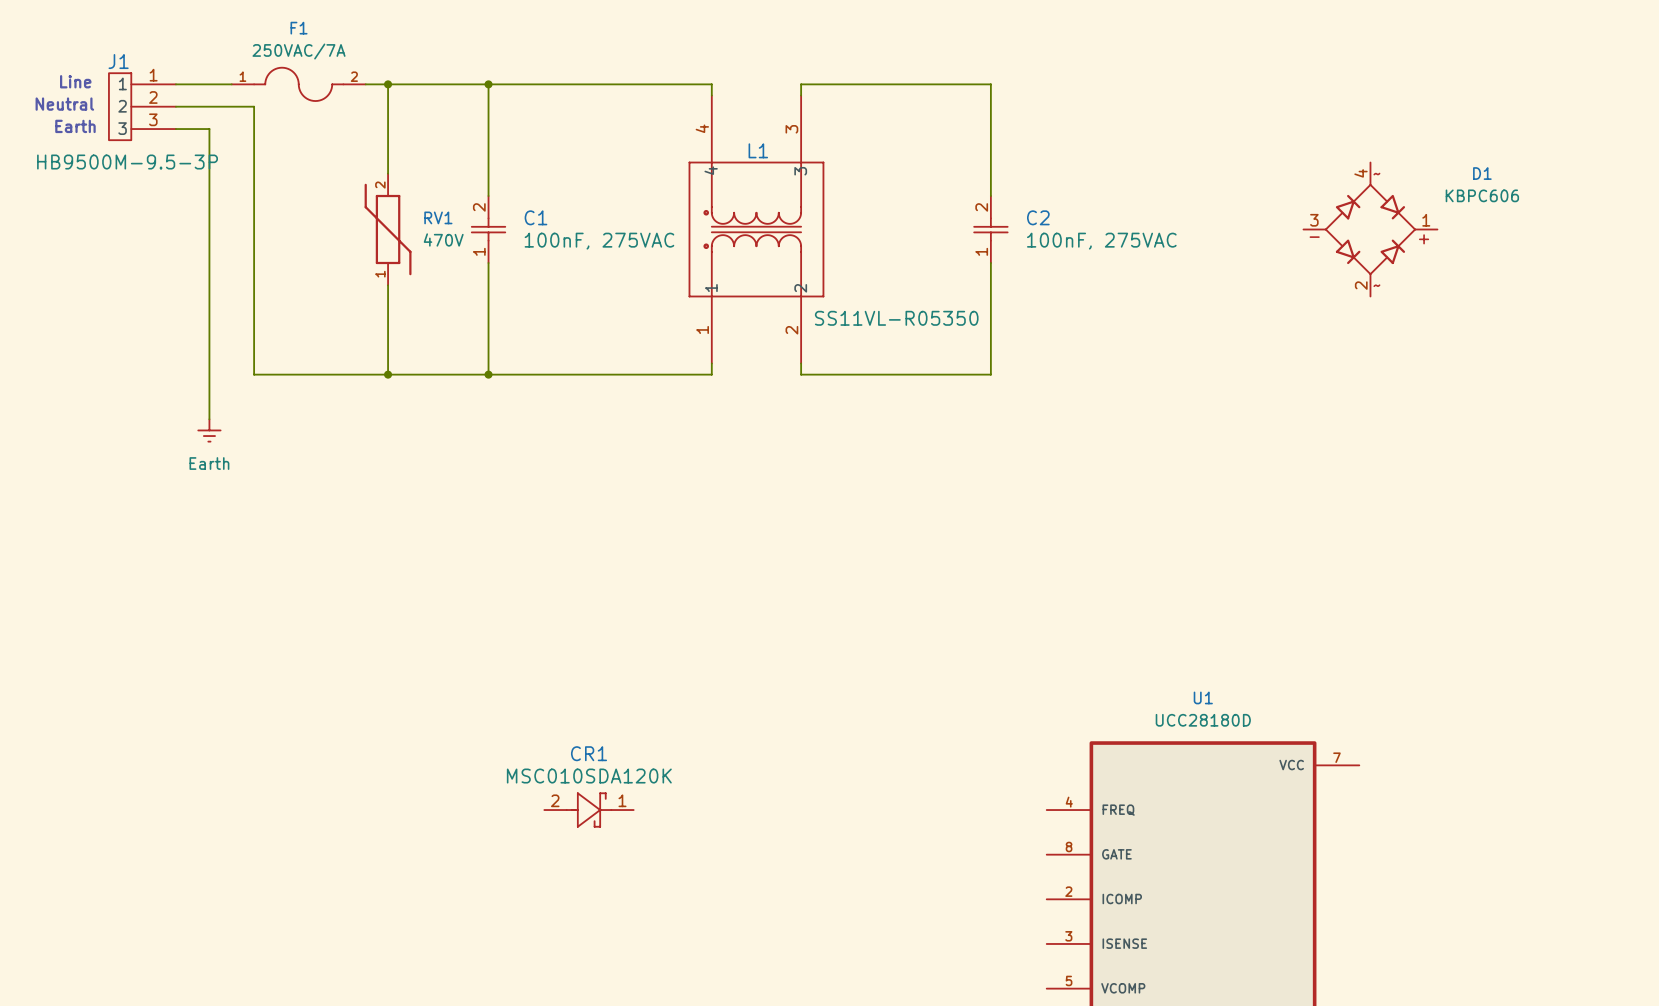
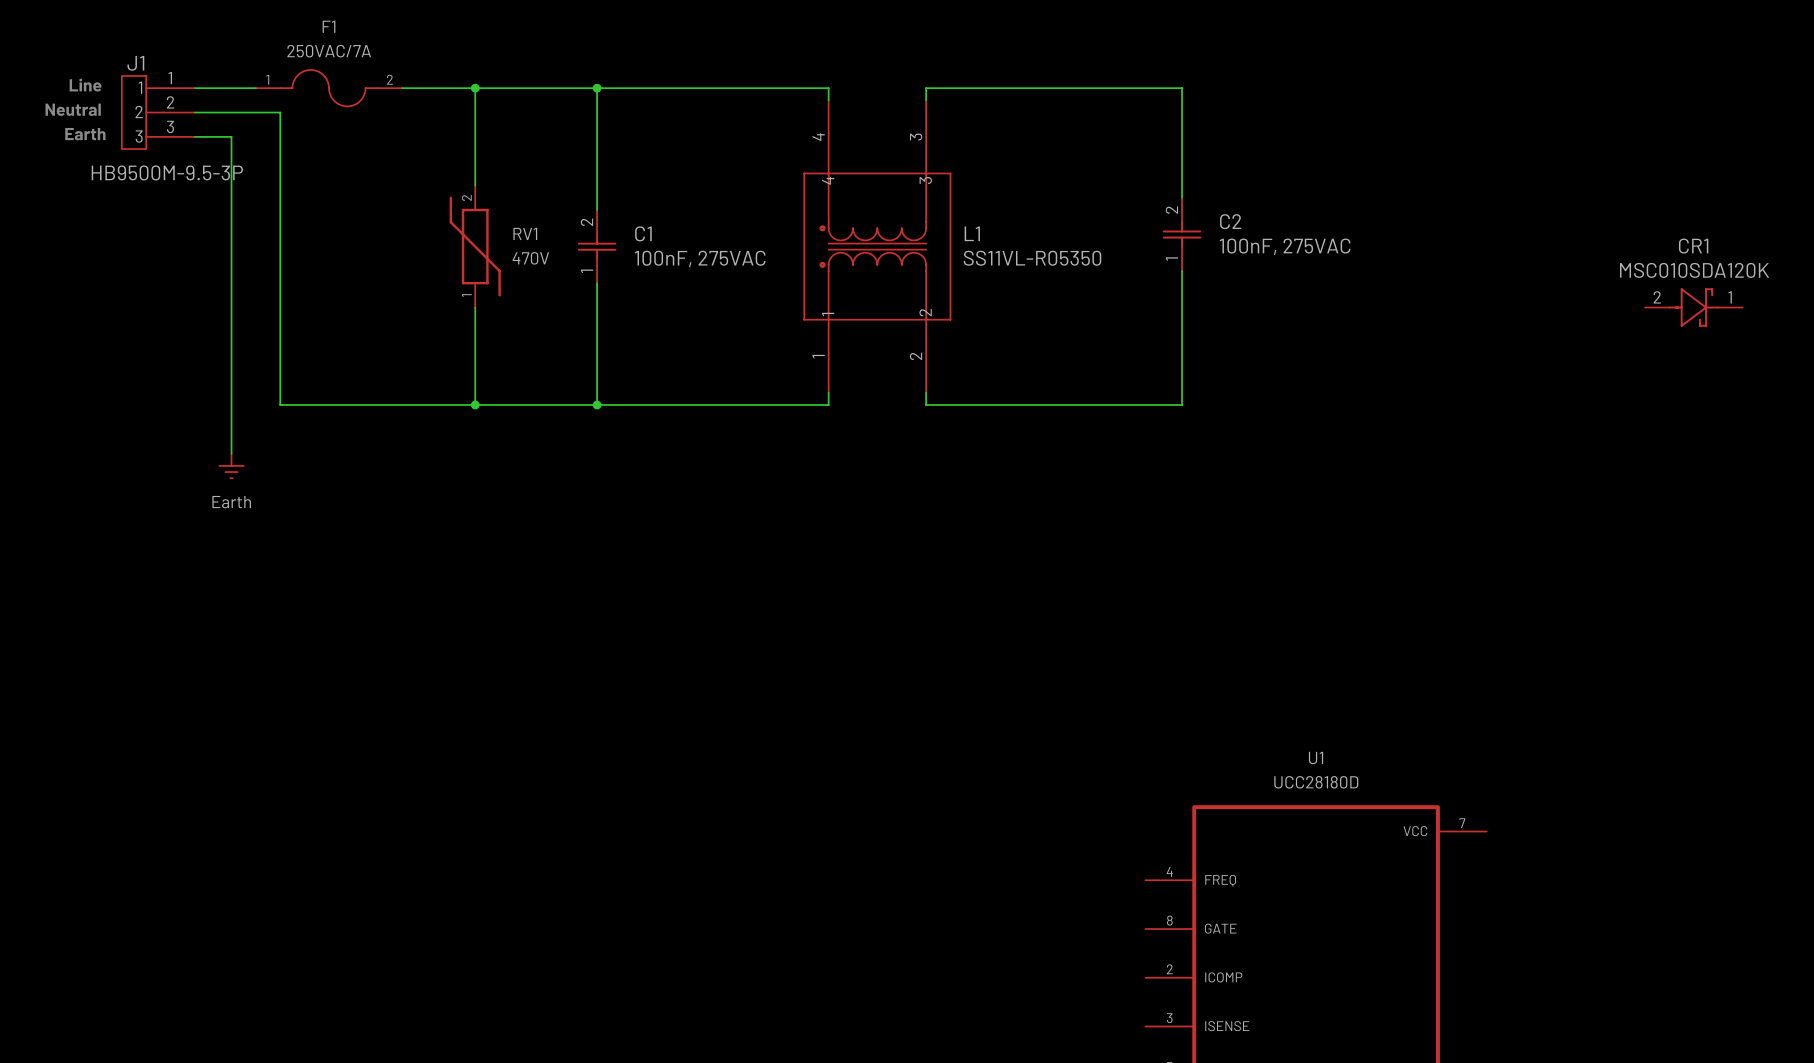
wire: (388, 84) (388, 173) -> (475, 88) (475, 185)
junction: (388, 84) -> none
junction: none -> (475, 88)
wire: (488, 84) (488, 196) -> (597, 88) (597, 210)
junction: (488, 84) -> none
junction: none -> (597, 88)
wire: (711, 84) (711, 95) -> (779, 88) (828, 88) (828, 100)
wire: (845, 84) (801, 84) (801, 95) -> (926, 88) (926, 100)
wire: (990, 84) (990, 196) -> (1084, 88) (1182, 88) (1182, 197)
L1 name position: L1 (758, 150) -> L1 (972, 233)
RV1 position: (388, 229) -> (475, 246)
C1 position: (488, 229) -> (597, 246)
L1 position: (756, 229) -> (877, 246)
C2 position: (990, 229) -> (1182, 234)
D1: KBPC606 (1370, 229) -> none
wire: (488, 262) (488, 374) -> (597, 283) (597, 405)
wire: (990, 262) (990, 374) -> (1182, 270) (1182, 405) (1084, 405)
wire: (388, 285) (388, 374) -> (475, 307) (475, 405)
L1 value position: SS11VL-R05350 (896, 318) -> SS11VL-R05350 (1032, 258)
wire: (711, 363) (711, 374) -> (828, 392) (828, 405) (779, 405)
wire: (801, 363) (801, 374) (845, 374) -> (926, 392) (926, 405)
junction: (388, 374) -> none
junction: none -> (475, 405)
junction: (488, 374) -> none
junction: none -> (597, 405)
CR1 position: (589, 810) -> (1693, 307)

